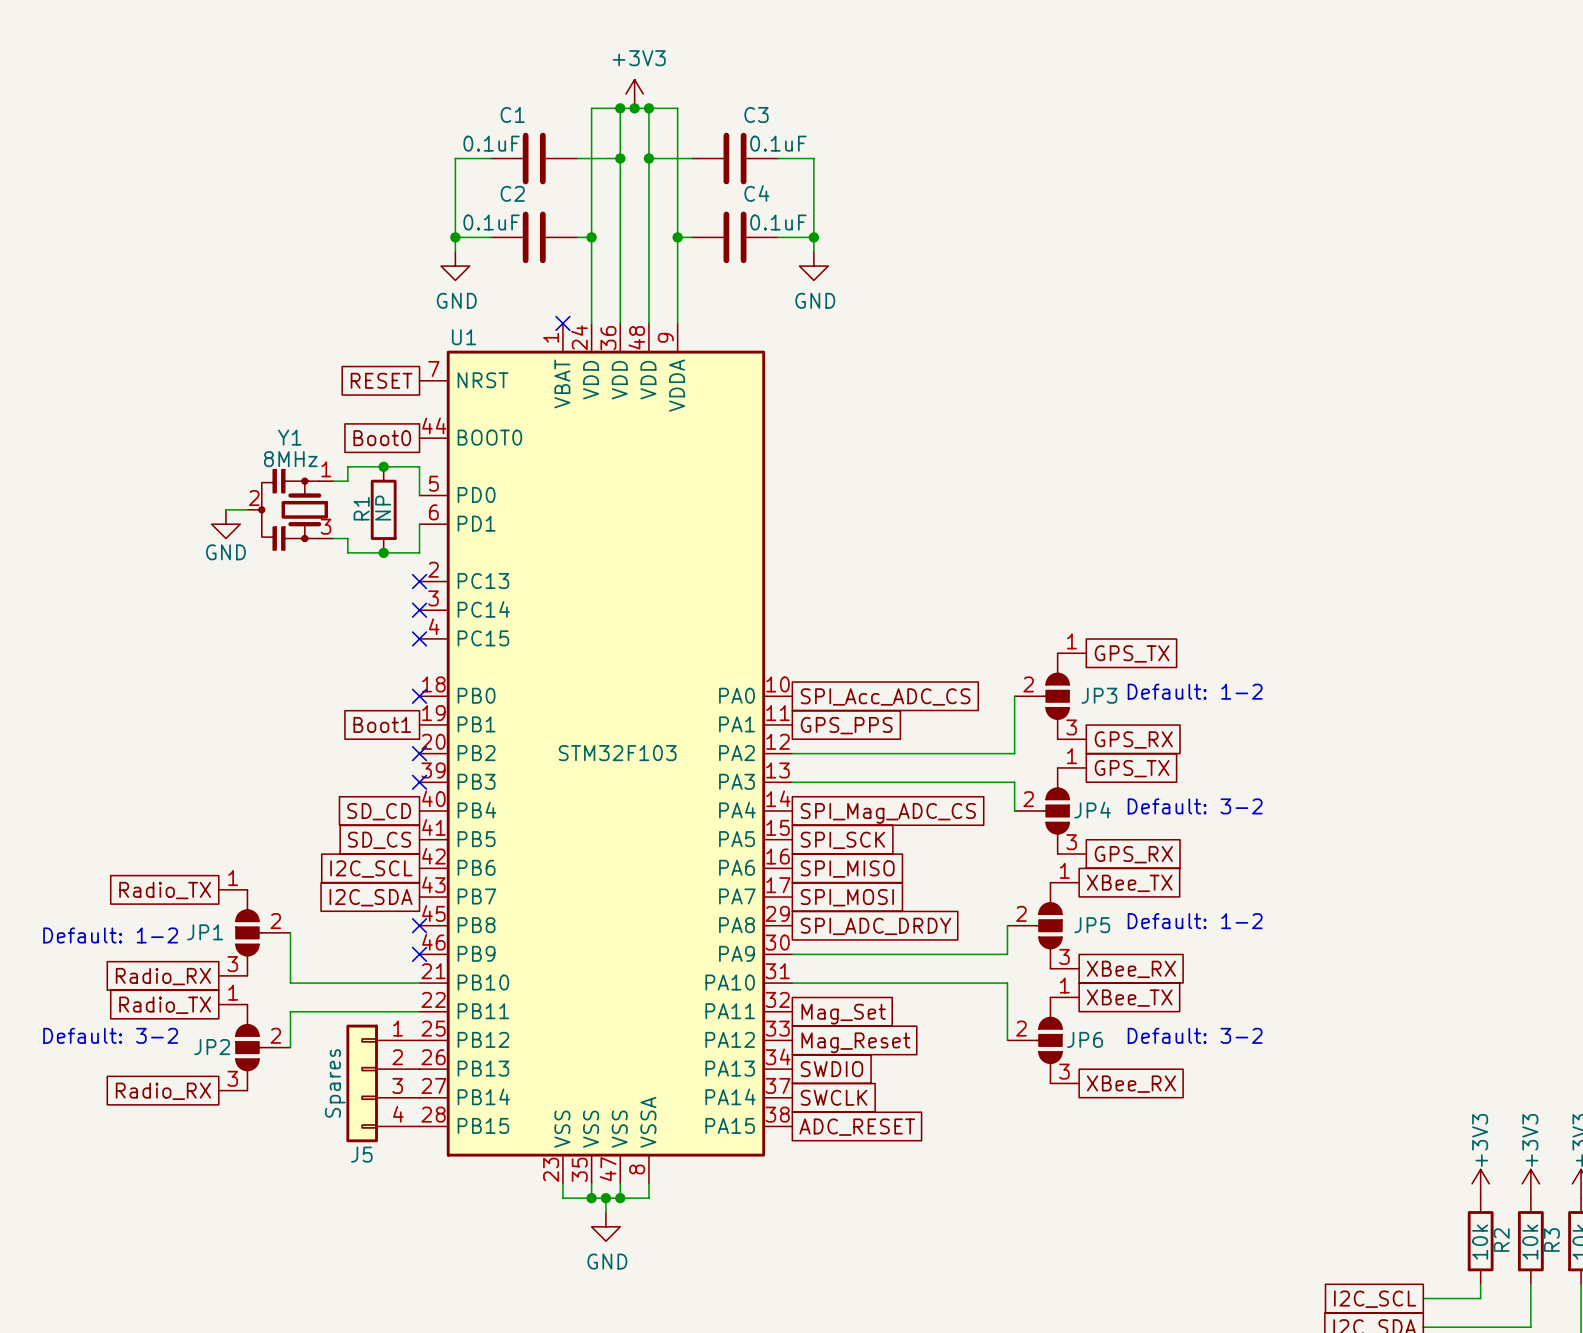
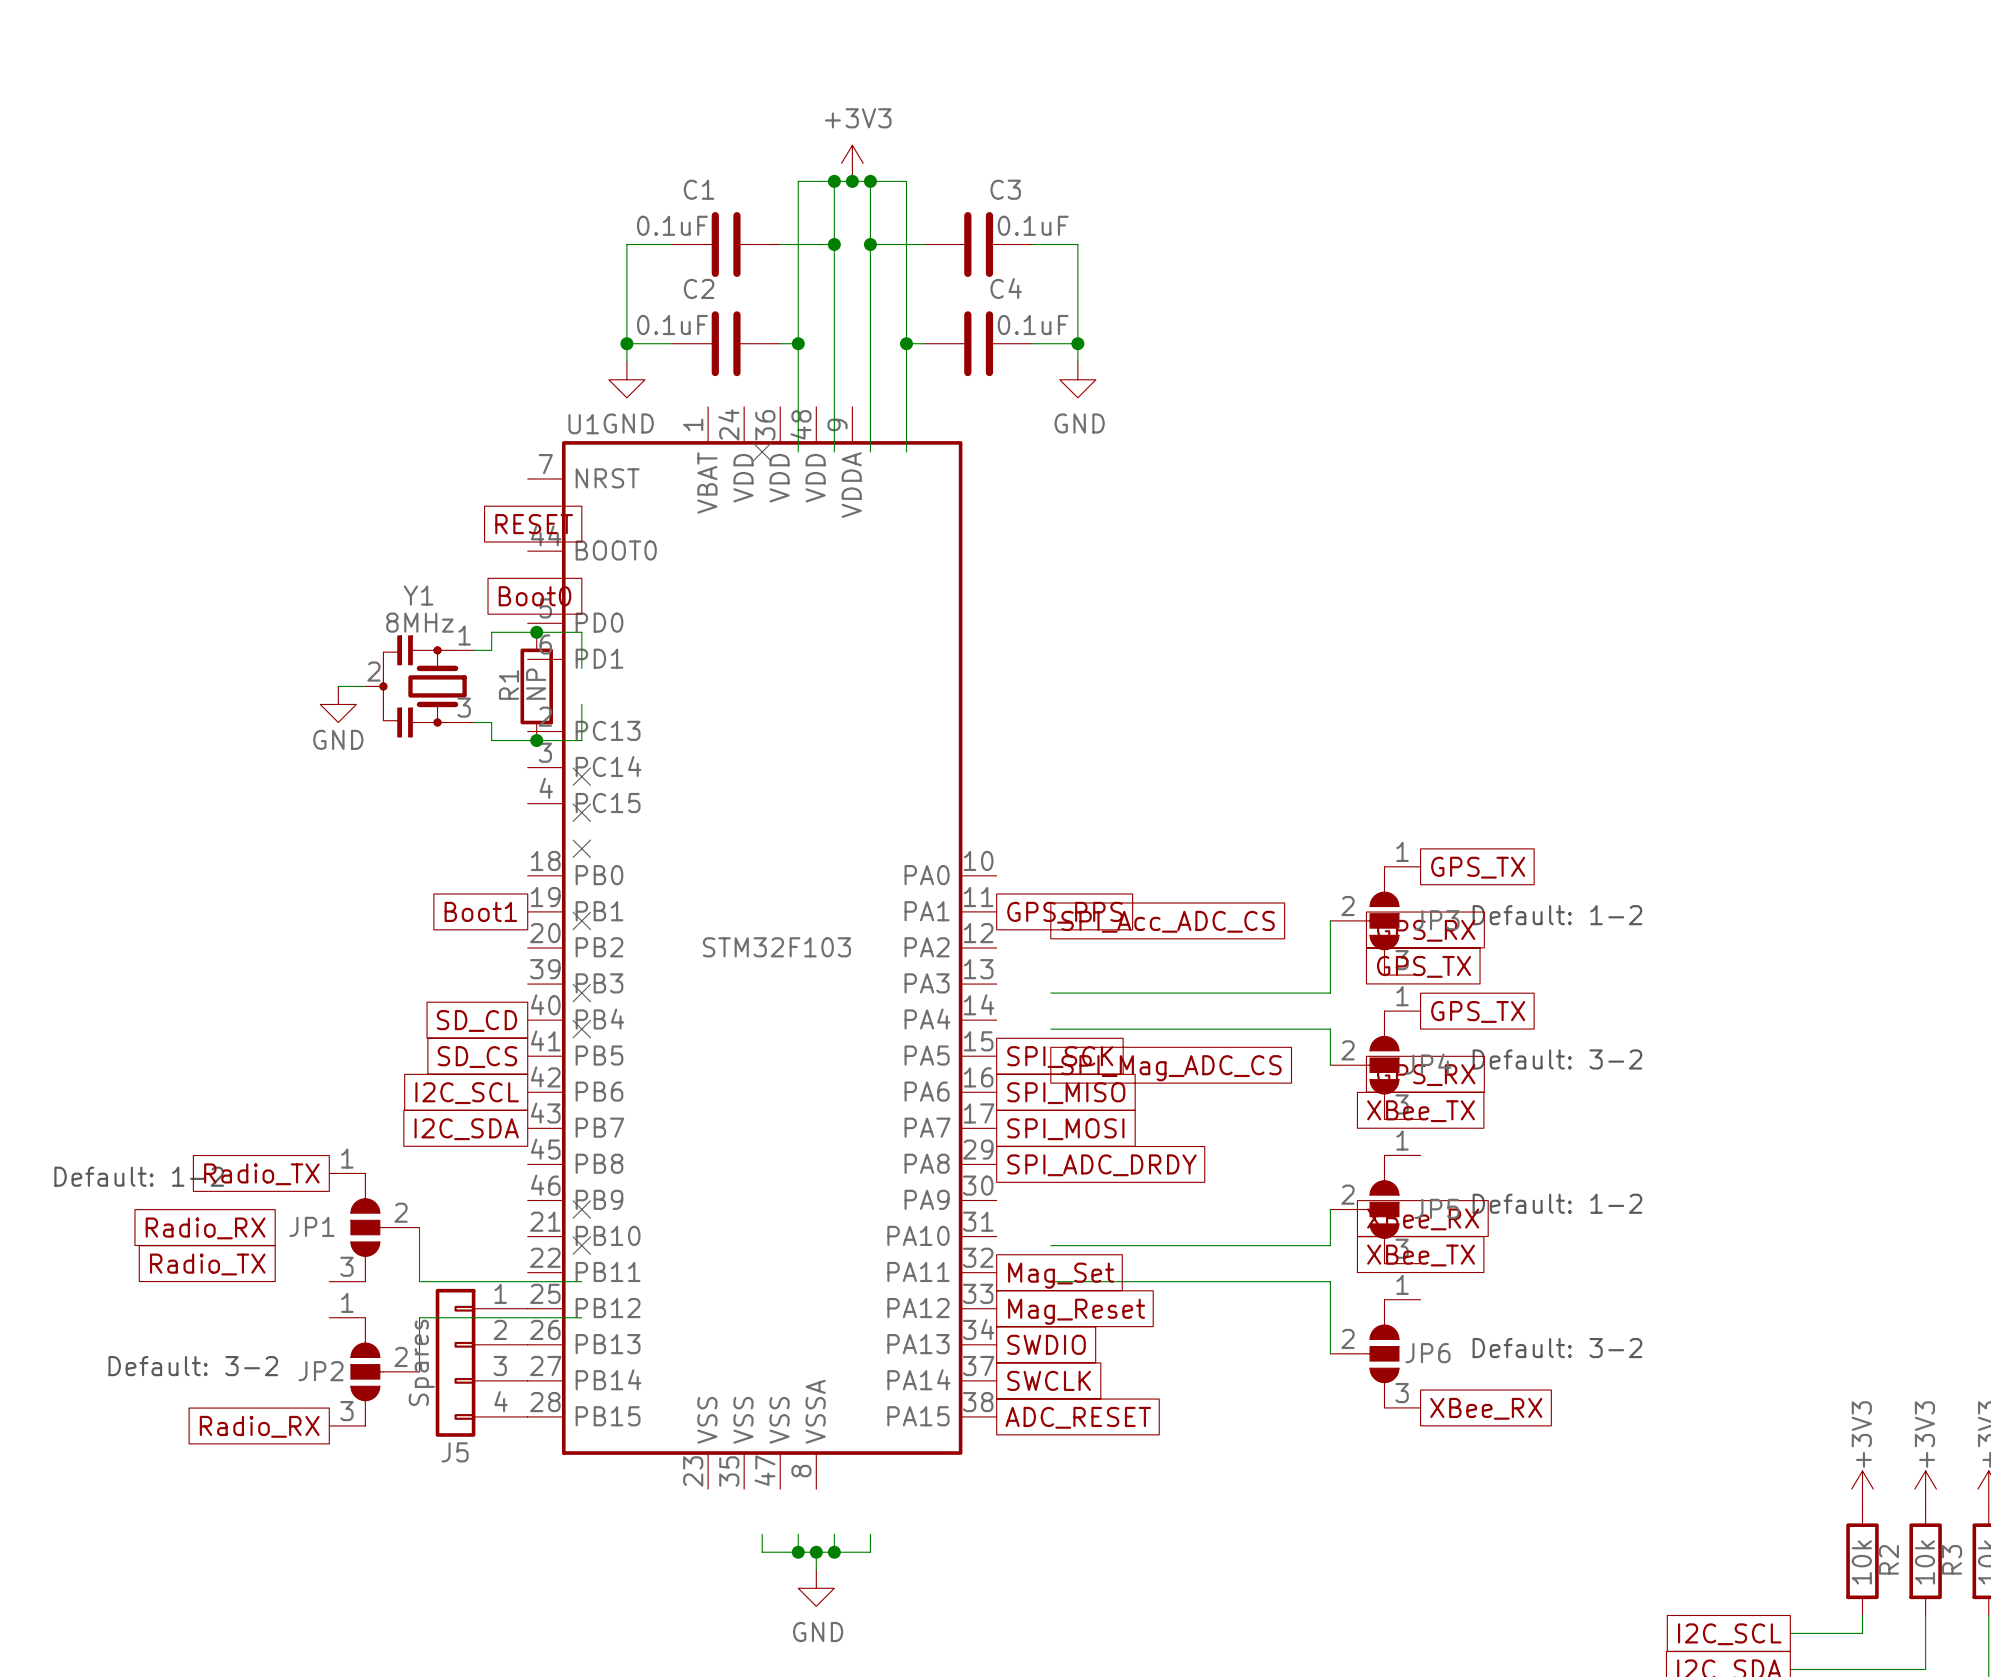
power symbol position: +3V3 (634, 94) -> +3V3 (852, 163)
wire: (620, 108) (620, 323) -> (834, 181) (834, 451)
junction: (620, 108) -> none
junction: (634, 108) -> none
wire: (648, 108) (648, 323) -> (870, 181) (870, 451)
junction: (648, 108) -> none
junction: none -> (834, 181)
junction: none -> (852, 181)
junction: none -> (870, 181)
wire: (491, 158) (455, 158) (455, 251) -> (672, 244) (626, 244) (626, 361)
C1 position: (534, 158) -> (726, 244)
wire: (577, 158) (620, 158) -> (780, 244) (834, 244)
junction: (620, 158) -> none
wire: (648, 158) (691, 158) -> (870, 244) (924, 244)
junction: (648, 158) -> none
C3 position: (735, 158) -> (978, 244)
wire: (778, 158) (813, 158) (813, 251) -> (1032, 244) (1077, 244) (1077, 361)
junction: none -> (834, 244)
junction: none -> (870, 244)
wire: (455, 237) (491, 237) -> (626, 343) (672, 343)
junction: (455, 237) -> none
C2 position: (534, 237) -> (726, 343)
wire: (577, 237) (591, 237) -> (780, 343) (798, 343)
junction: (591, 237) -> none
wire: (677, 237) (691, 237) -> (906, 343) (924, 343)
junction: (677, 237) -> none
C4 position: (735, 237) -> (978, 343)
wire: (778, 237) (813, 237) -> (1032, 343) (1077, 343)
junction: (813, 237) -> none
power symbol position: GND (455, 266) -> GND (626, 379)
power symbol position: GND (813, 266) -> GND (1077, 379)
junction: none -> (626, 343)
junction: none -> (798, 343)
junction: none -> (906, 343)
junction: none -> (1077, 343)
no-connect mark position: (562, 323) -> (762, 451)
wire: (591, 323) (591, 108) (677, 108) (677, 323) -> (798, 451) (798, 181) (906, 181) (906, 451)
global label position: RESET (381, 380) -> RESET (534, 524)
global label position: Boot0 (382, 438) -> Boot0 (534, 596)
junction: (383, 466) -> none
wire: (333, 481) (347, 481) (347, 466) (419, 466) (419, 495) -> (473, 650) (491, 650) (491, 632) (581, 632) (581, 668)
junction: none -> (536, 632)
wire: (225, 509) (247, 509) -> (338, 686) (365, 686)
Y1 position: (290, 509) -> (419, 686)
R1 position: (383, 509) -> (536, 686)
power symbol position: GND (225, 524) -> GND (338, 704)
wire: (419, 524) (419, 552) (347, 552) (347, 538) (333, 538) -> (581, 704) (581, 740) (491, 740) (491, 722) (473, 722)
junction: (383, 552) -> none
no-connect mark: (419, 581) -> none
junction: none -> (536, 740)
no-connect mark: (419, 610) -> none
no-connect mark: none -> (581, 776)
no-connect mark: (419, 638) -> none
no-connect mark: none -> (581, 812)
global label position: GPS_TX (1132, 653) -> GPS_TX (1478, 867)
no-connect mark: none -> (581, 848)
text position: Default: 1-2 (1195, 691) -> Default: 1-2 (1557, 915)
no-connect mark: (419, 696) -> none
global label position: SPI_Acc_ADC_CS (885, 696) -> SPI_Acc_ADC_CS (1168, 921)
wire: (1014, 696) (1014, 753) (792, 753) -> (1330, 920) (1330, 993) (1050, 993)
JP3 position: (1050, 696) -> (1375, 920)
no-connect mark: none -> (581, 920)
no-connect mark: (419, 753) -> none
no-connect mark: (419, 782) -> none
wire: (792, 782) (1014, 782) (1014, 810) -> (1050, 1029) (1330, 1029) (1330, 1065)
no-connect mark: none -> (581, 993)
global label: none -> GPS_TX (1478, 1011)
text position: Default: 3-2 (1195, 806) -> Default: 3-2 (1557, 1059)
JP4 position: (1050, 810) -> (1375, 1065)
global label position: SPI_Mag_ADC_CS (888, 813) -> SPI_Mag_ADC_CS (1171, 1068)
no-connect mark: none -> (581, 1029)
global label position: Radio_TX (165, 890) -> Radio_TX (261, 1174)
text position: Default: 1-2 (1195, 921) -> Default: 1-2 (1557, 1203)
no-connect mark: (419, 925) -> none
wire: (1007, 925) (1007, 954) (792, 954) -> none
JP5 position: (1043, 925) -> (1375, 1209)
JP1 position: (254, 932) -> (374, 1227)
wire: (290, 932) (290, 983) (419, 983) -> none
no-connect mark: (419, 954) -> none
no-connect mark: none -> (581, 1209)
wire: none -> (1330, 1209) (1330, 1245) (1050, 1245)
wire: none -> (419, 1227) (419, 1281) (581, 1281)
wire: (792, 983) (1007, 983) (1007, 1040) -> none
no-connect mark: none -> (581, 1245)
wire: (419, 1011) (290, 1011) (290, 1047) -> none
wire: none -> (1050, 1281) (1330, 1281) (1330, 1353)
text position: Default: 3-2 (110, 1035) -> Default: 3-2 (193, 1366)
text position: Default: 3-2 (1195, 1035) -> Default: 3-2 (1557, 1348)
JP6 position: (1043, 1040) -> (1375, 1353)
JP2 position: (254, 1047) -> (374, 1371)
wire: none -> (581, 1317) (419, 1317) (419, 1371)
global label position: XBee_RX (1131, 1084) -> XBee_RX (1486, 1408)
global label position: Radio_RX (163, 1091) -> Radio_RX (259, 1426)
wire: (562, 1183) (562, 1198) (648, 1198) (648, 1183) -> (762, 1534) (762, 1552) (870, 1552) (870, 1534)
wire: (591, 1183) (591, 1198) -> (798, 1534) (798, 1552)
wire: (620, 1183) (620, 1198) -> (834, 1534) (834, 1552)
junction: (591, 1198) -> none
wire: (605, 1198) (605, 1212) -> (816, 1552) (816, 1570)
junction: (605, 1198) -> none
junction: (620, 1198) -> none
power symbol position: GND (605, 1226) -> GND (816, 1588)
junction: none -> (798, 1552)
junction: none -> (816, 1552)
junction: none -> (834, 1552)

